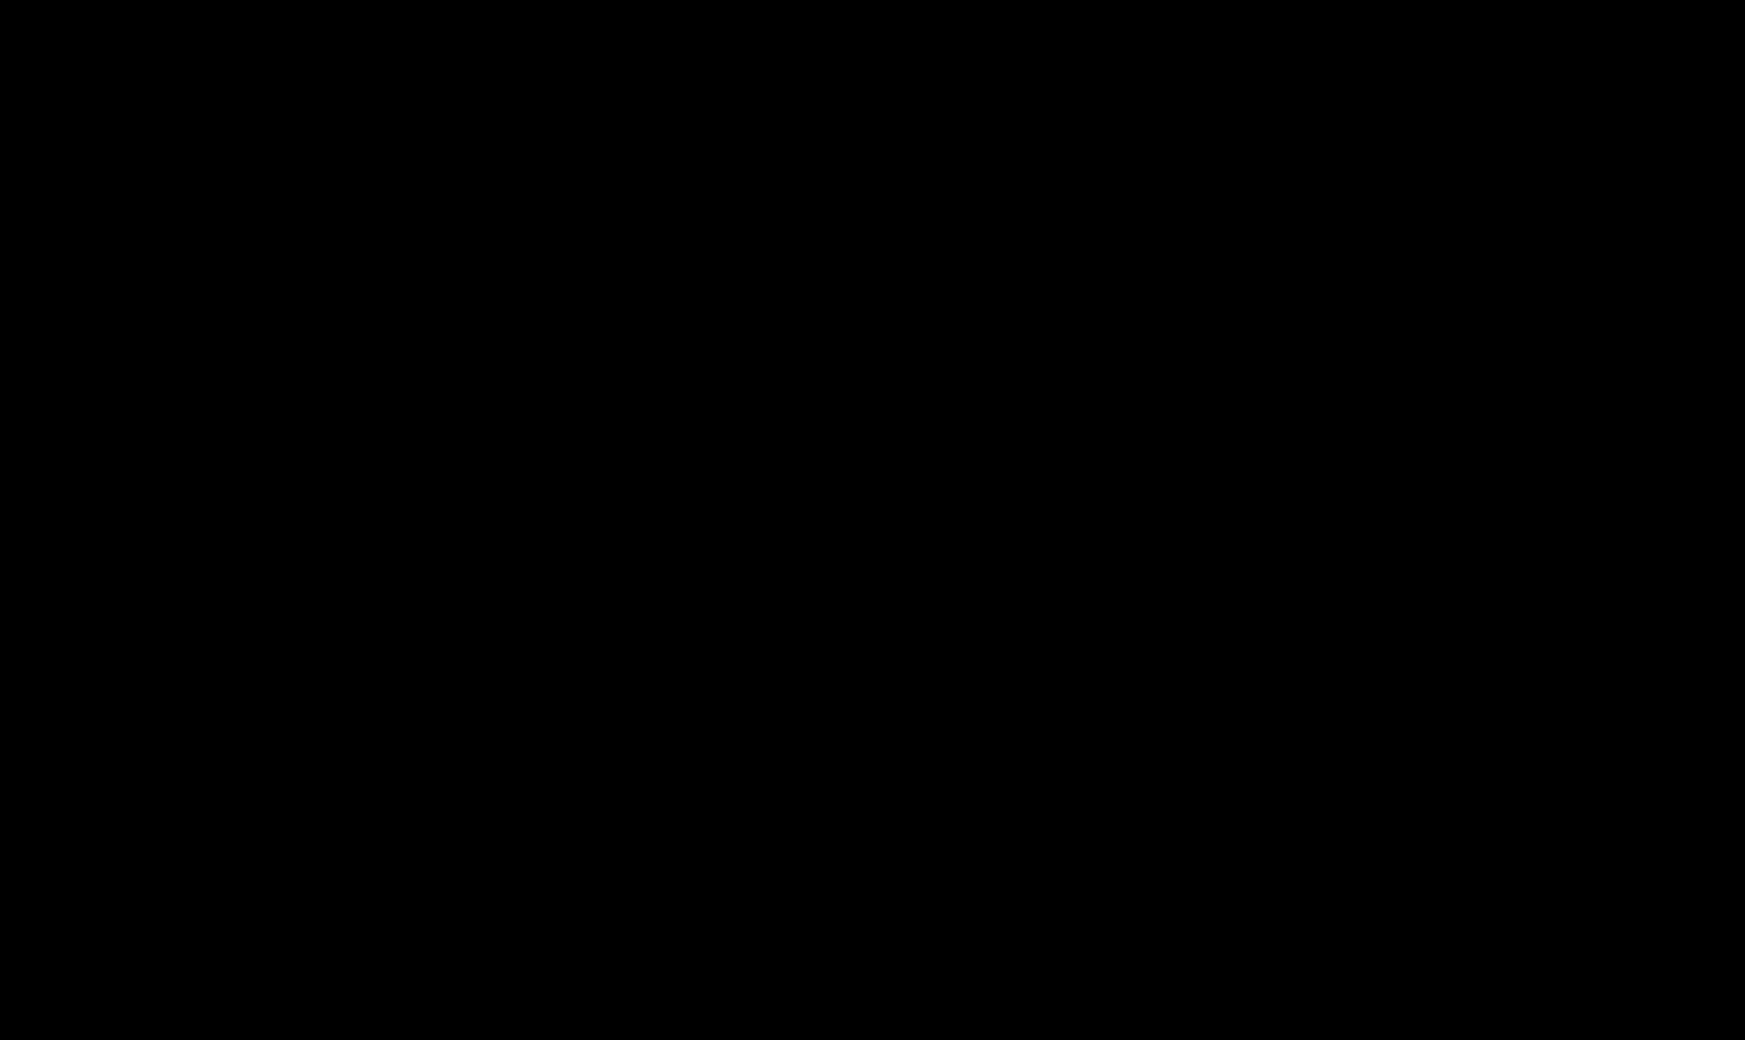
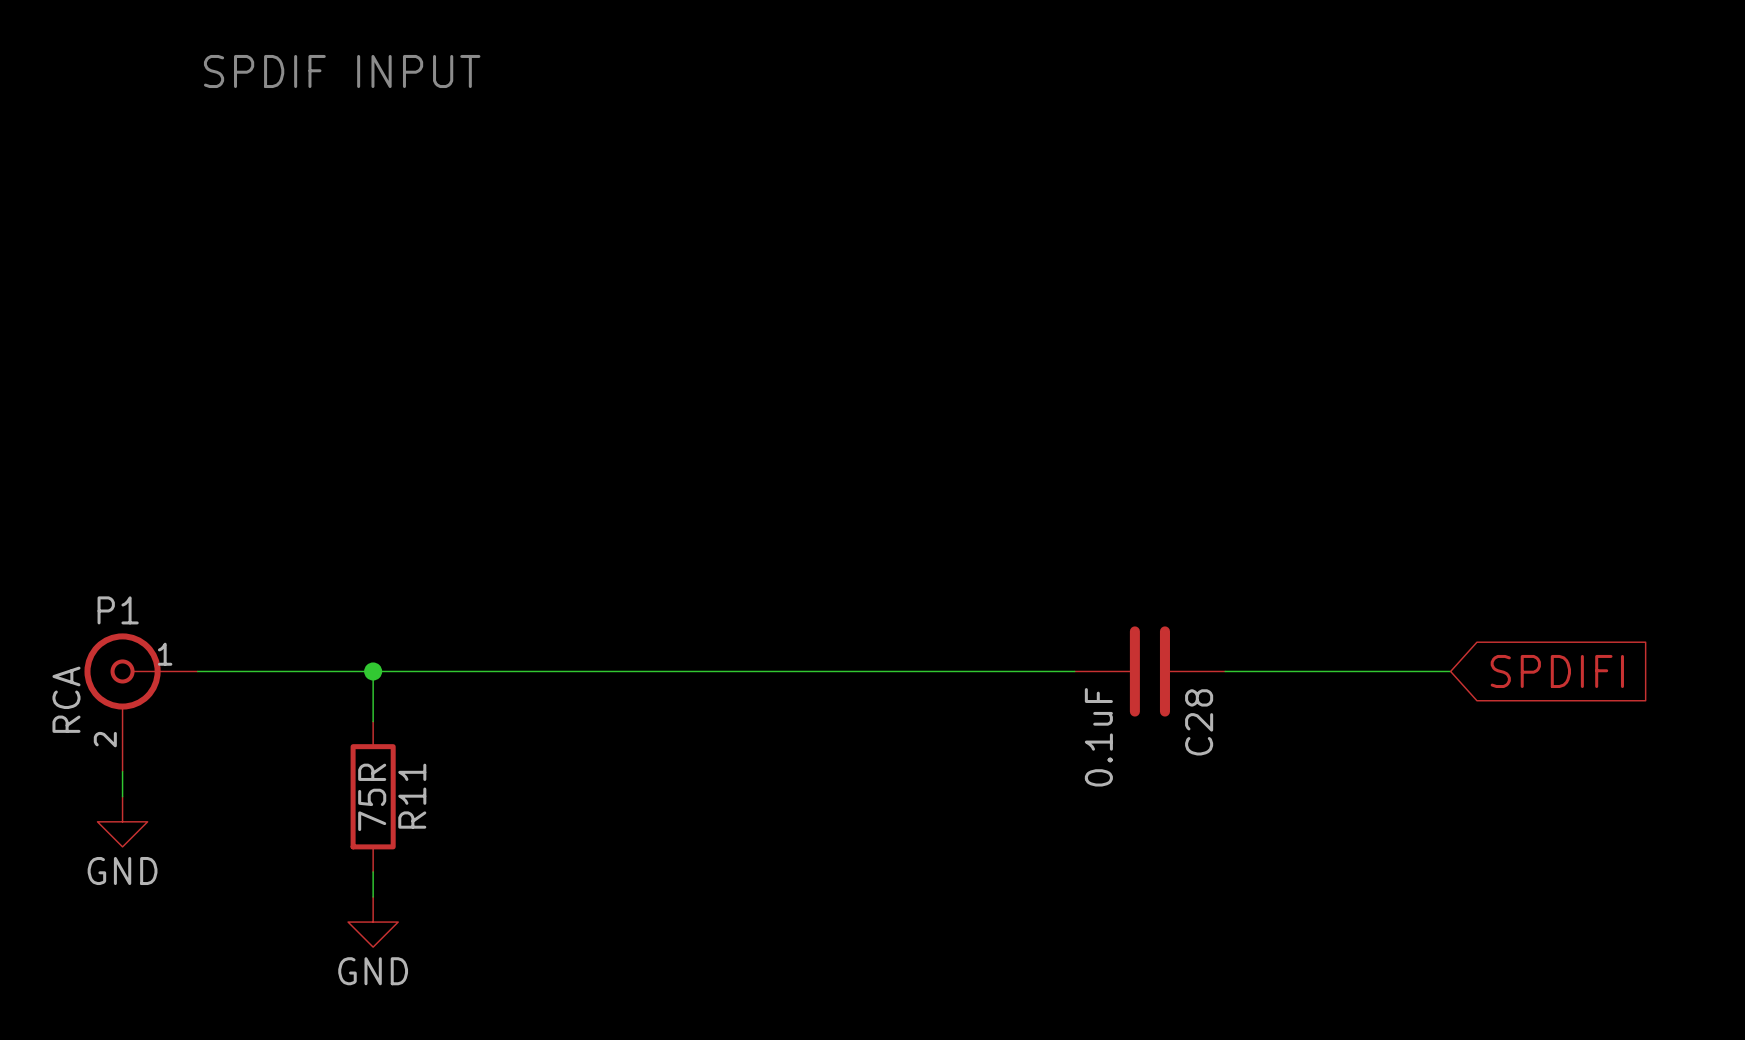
text: none -> SPDIF INPUT (342, 71)
wire: none -> (197, 671) (1074, 671)
wire: none -> (373, 671) (373, 721)
junction: none -> (373, 671)
C28: none -> 0.1uF (1149, 671)
wire: none -> (1225, 671) (1450, 671)
global label: none -> SPDIFI (1557, 671)
P1: none -> RCA (141, 702)
wire: none -> (122, 771) (122, 796)
R11: none -> 75R (373, 796)
power symbol: none -> GND (122, 821)
wire: none -> (373, 871) (373, 897)
power symbol: none -> GND (373, 922)

